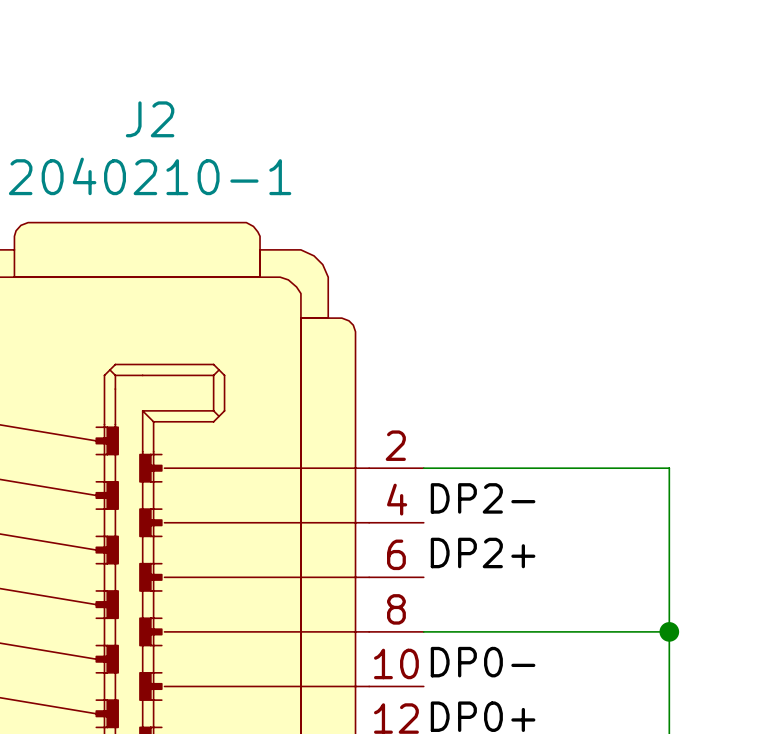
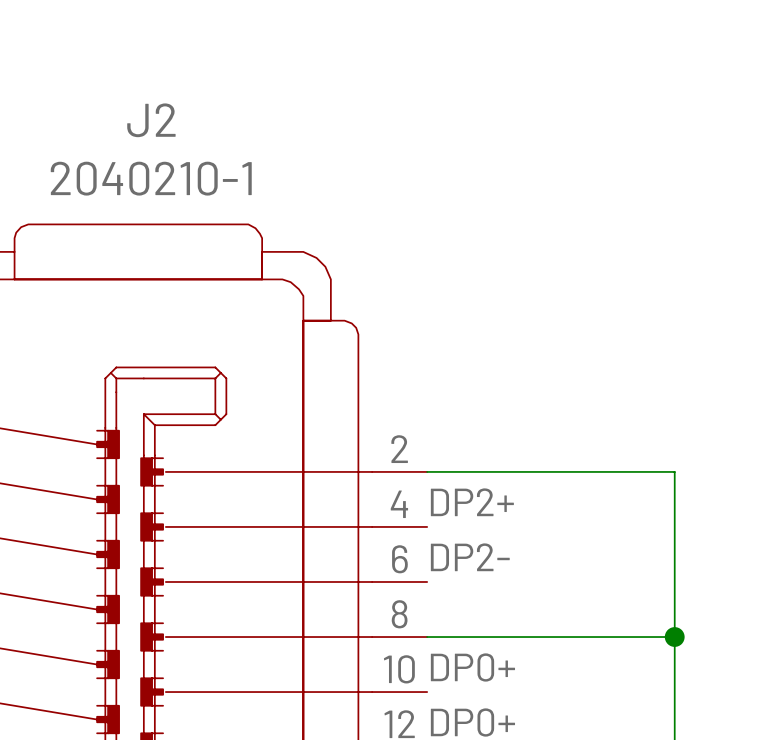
label: DP2- (483, 498) -> DP2+ (472, 502)
label: DP2+ (483, 552) -> DP2- (470, 557)
label: DP0- (483, 662) -> DP0+ (472, 667)

